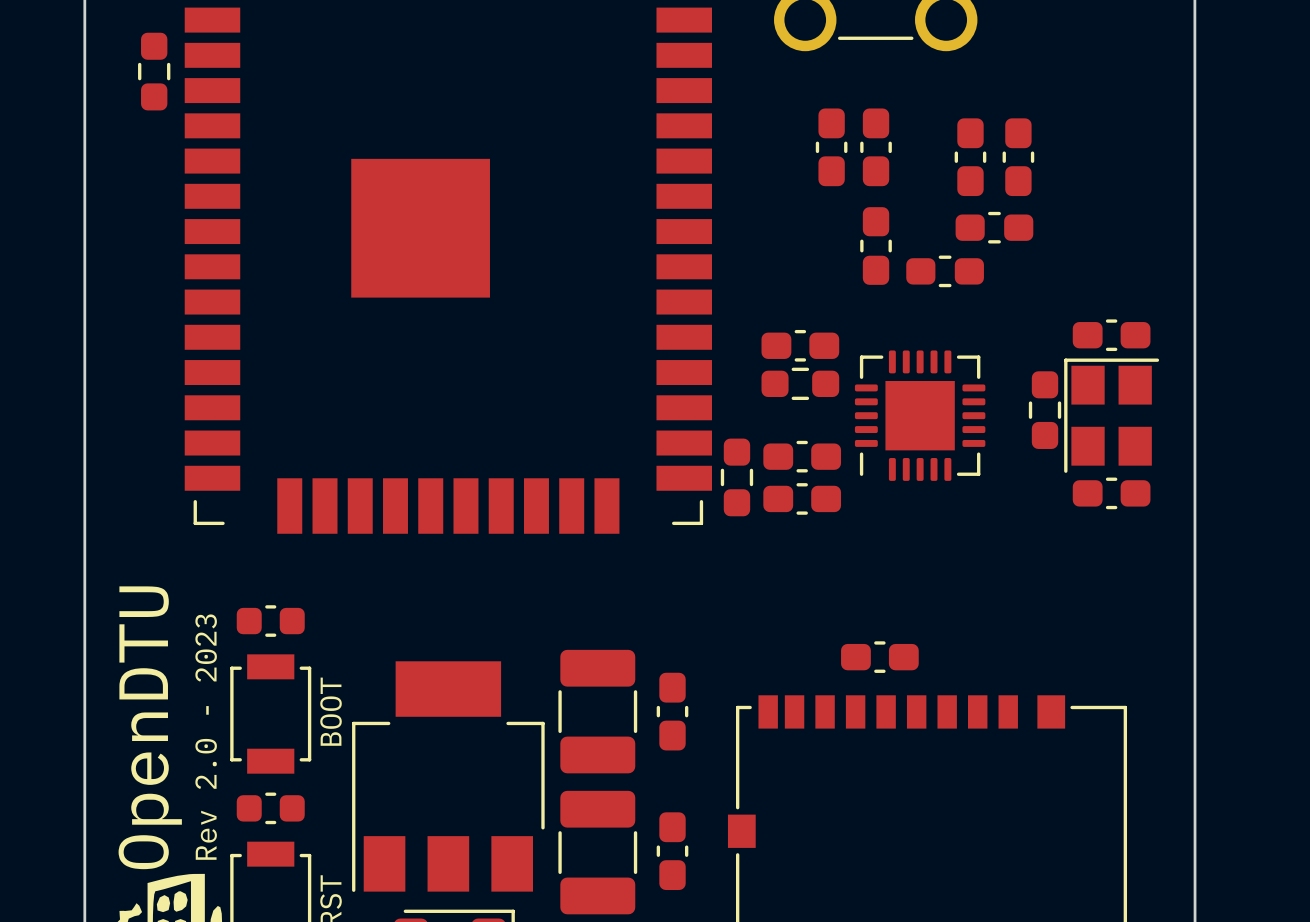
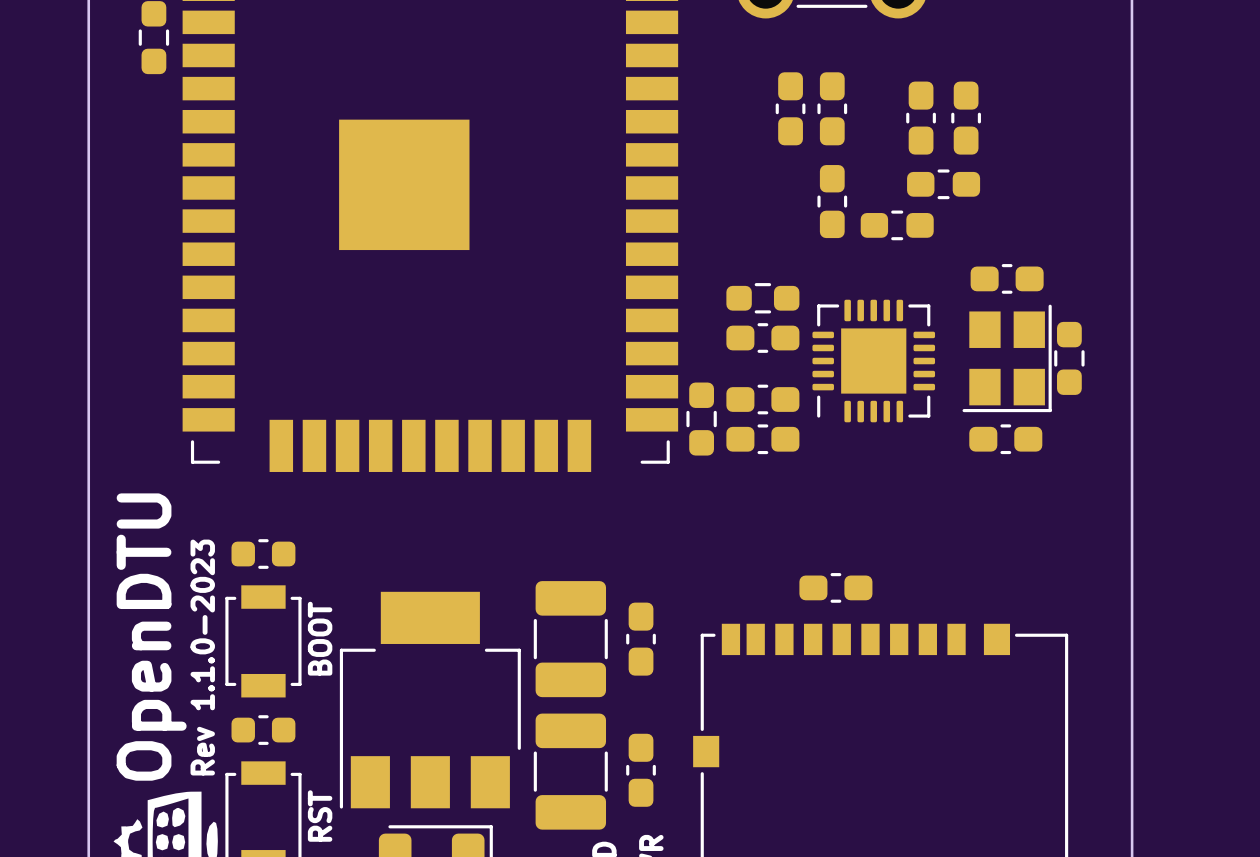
part footprint: [761, 329, 840, 362] -> [726, 283, 800, 314]
part position: (1111, 335) -> (1007, 278)
part footprint: [1064, 358, 1160, 473] -> [1054, 321, 1085, 395]
part footprint: [761, 367, 840, 401] -> [726, 323, 800, 353]
part footprint: [1028, 371, 1062, 449] -> [962, 304, 1052, 413]
part position: (1111, 493) -> (1005, 439)
text: Rev 2.0 - 2023 (206, 737) -> Rev 1.1.0-2023 (202, 657)

